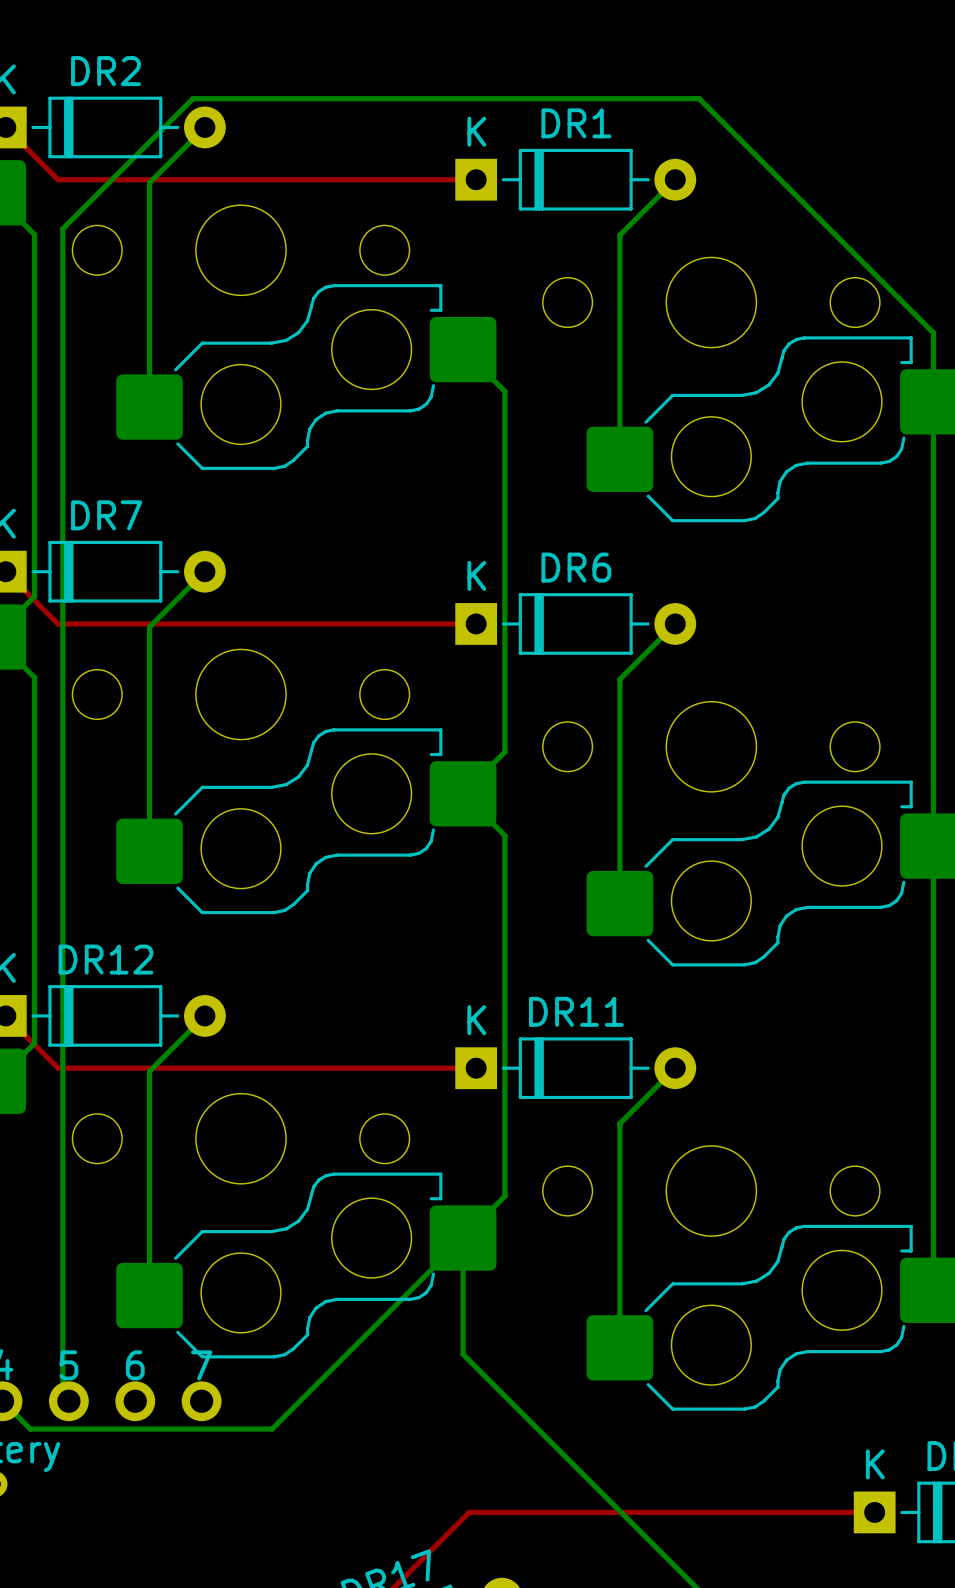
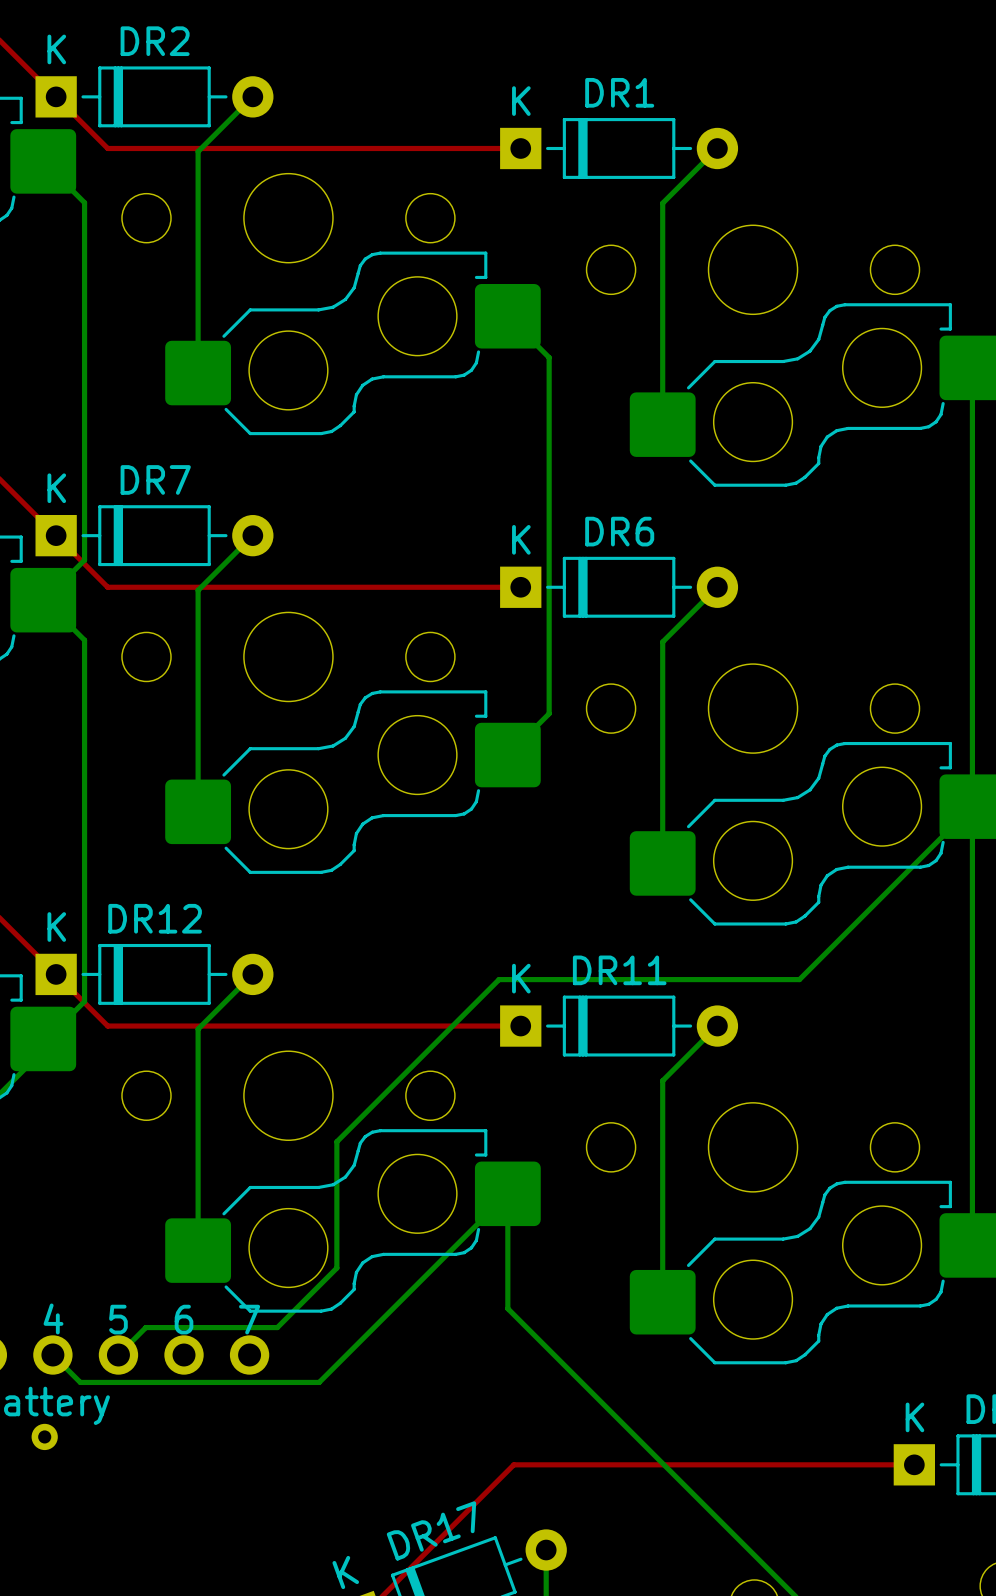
bottom track: (933, 401) (933, 332) (699, 98) (193, 98) (62, 228) (62, 1395) (68, 1401) -> (972, 806) (799, 979) (499, 979) (336, 1141) (336, 1268) (277, 1327) (145, 1327) (118, 1355)
bottom track: (463, 793) (504, 835) (504, 1196) (463, 1238) -> none

